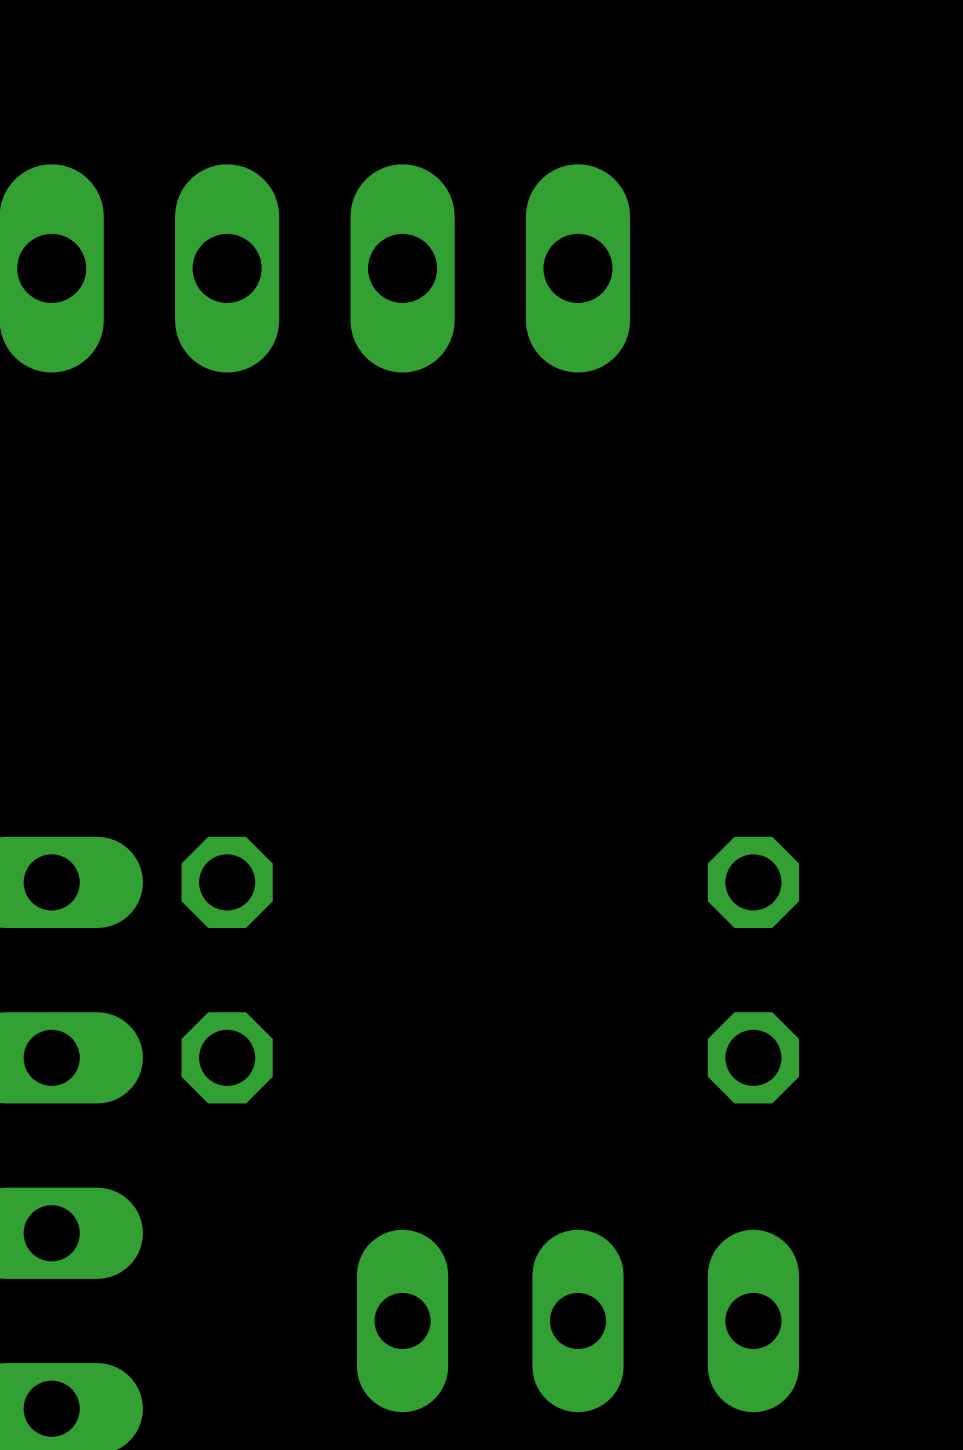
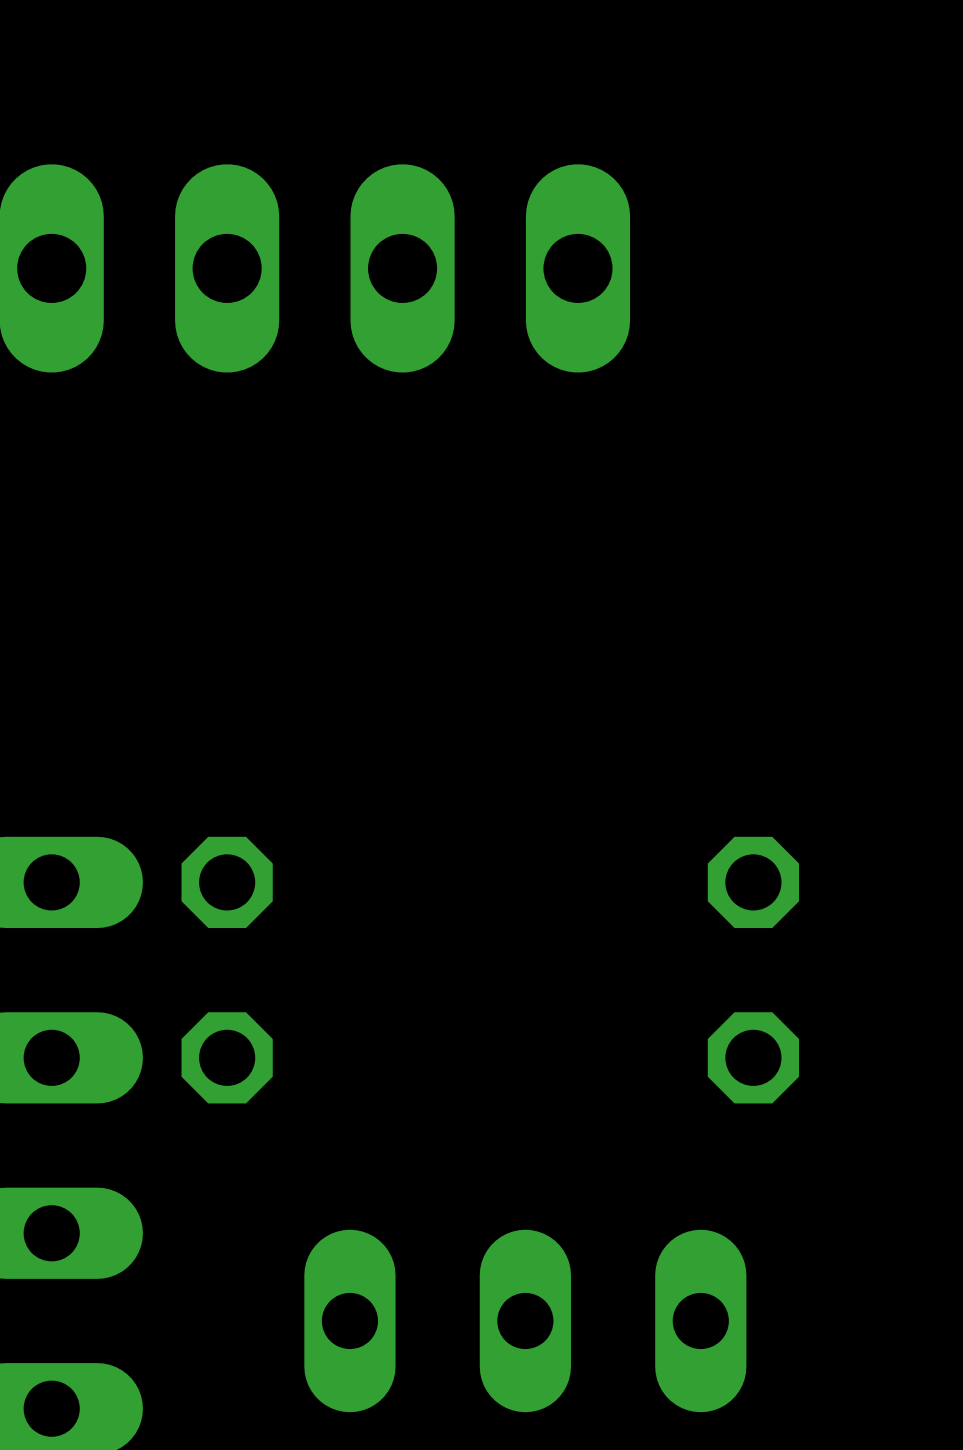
part position: (577, 1320) -> (525, 1320)

